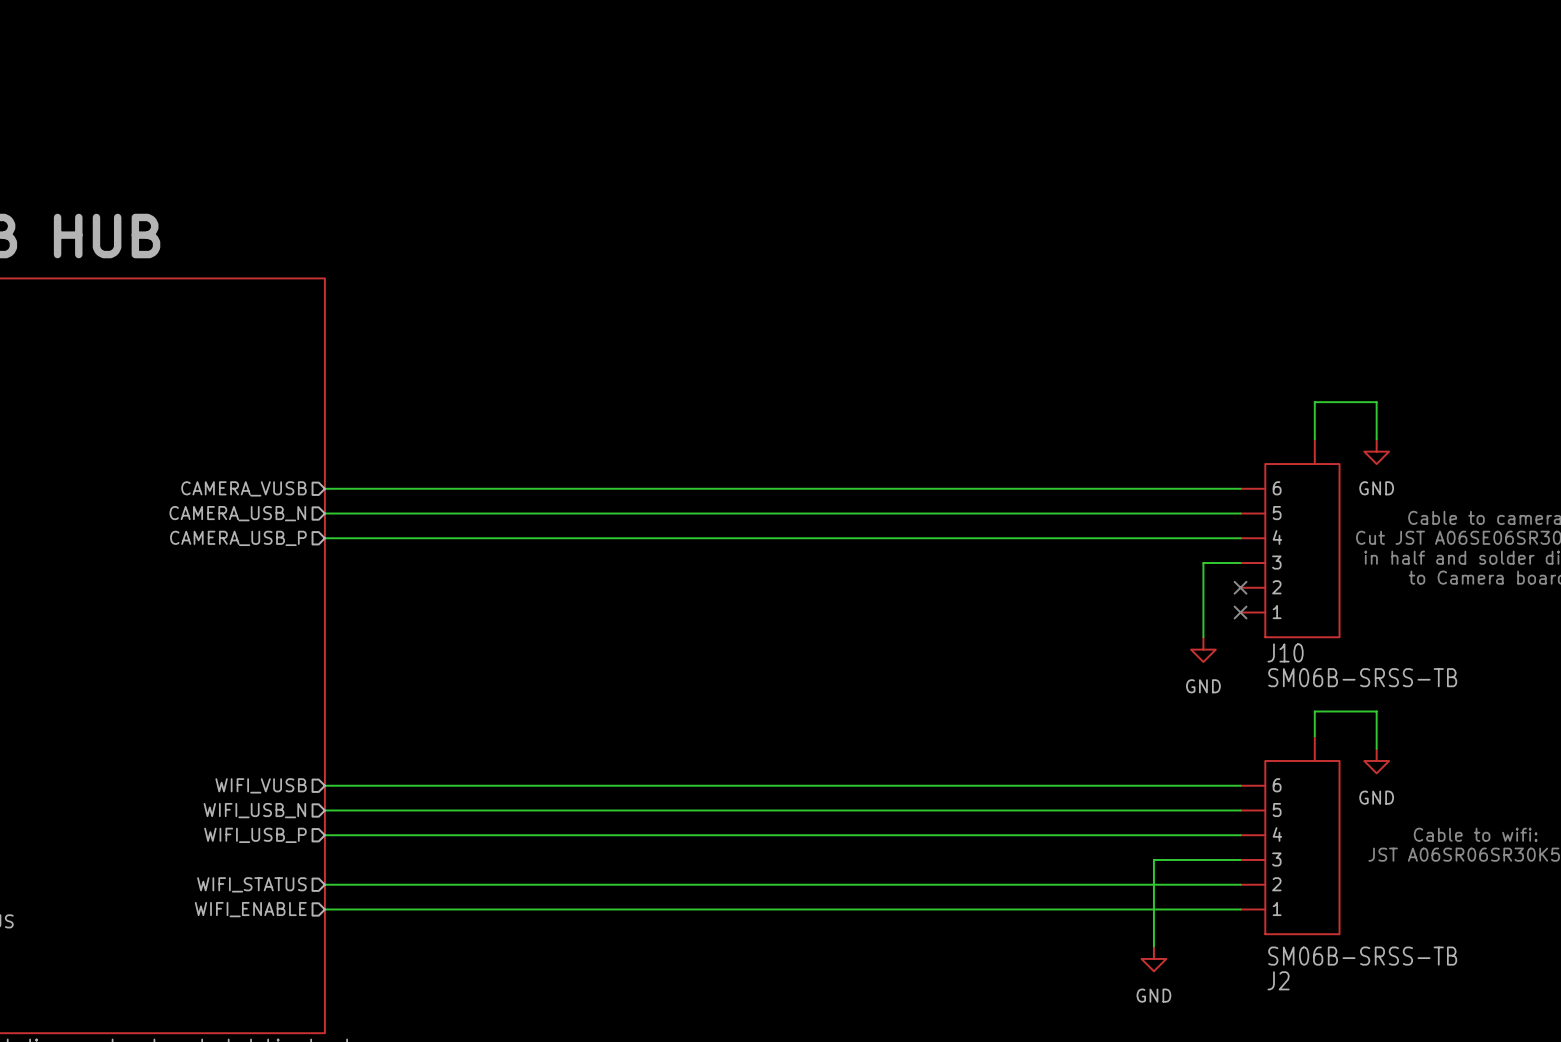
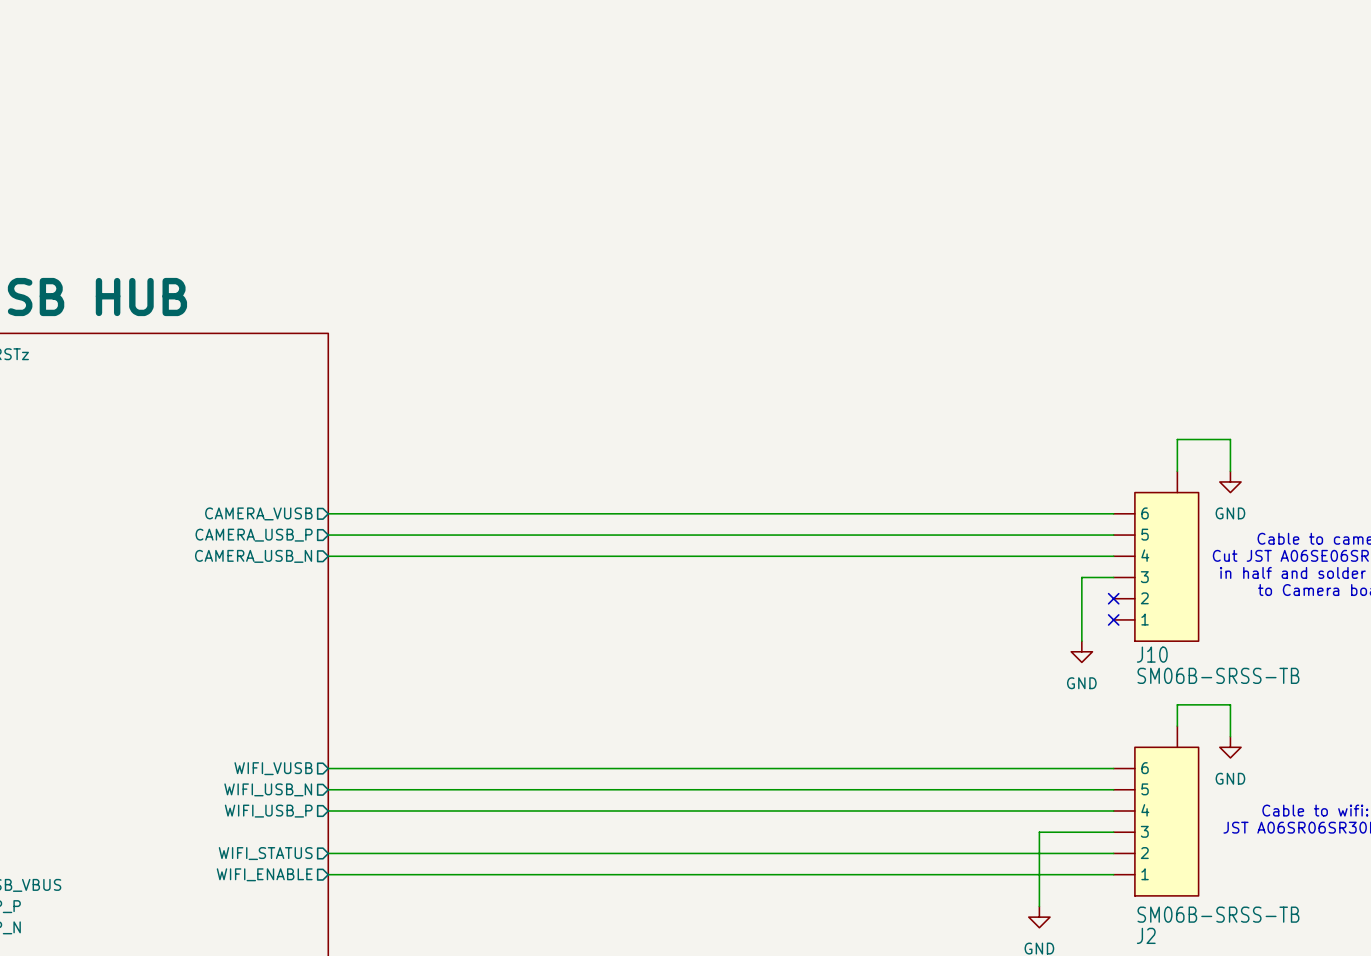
sheet pin: CAMERA_USB_N (237, 513) -> CAMERA_USB_P (254, 535)
sheet pin: CAMERA_USB_P (238, 538) -> CAMERA_USB_N (253, 556)

